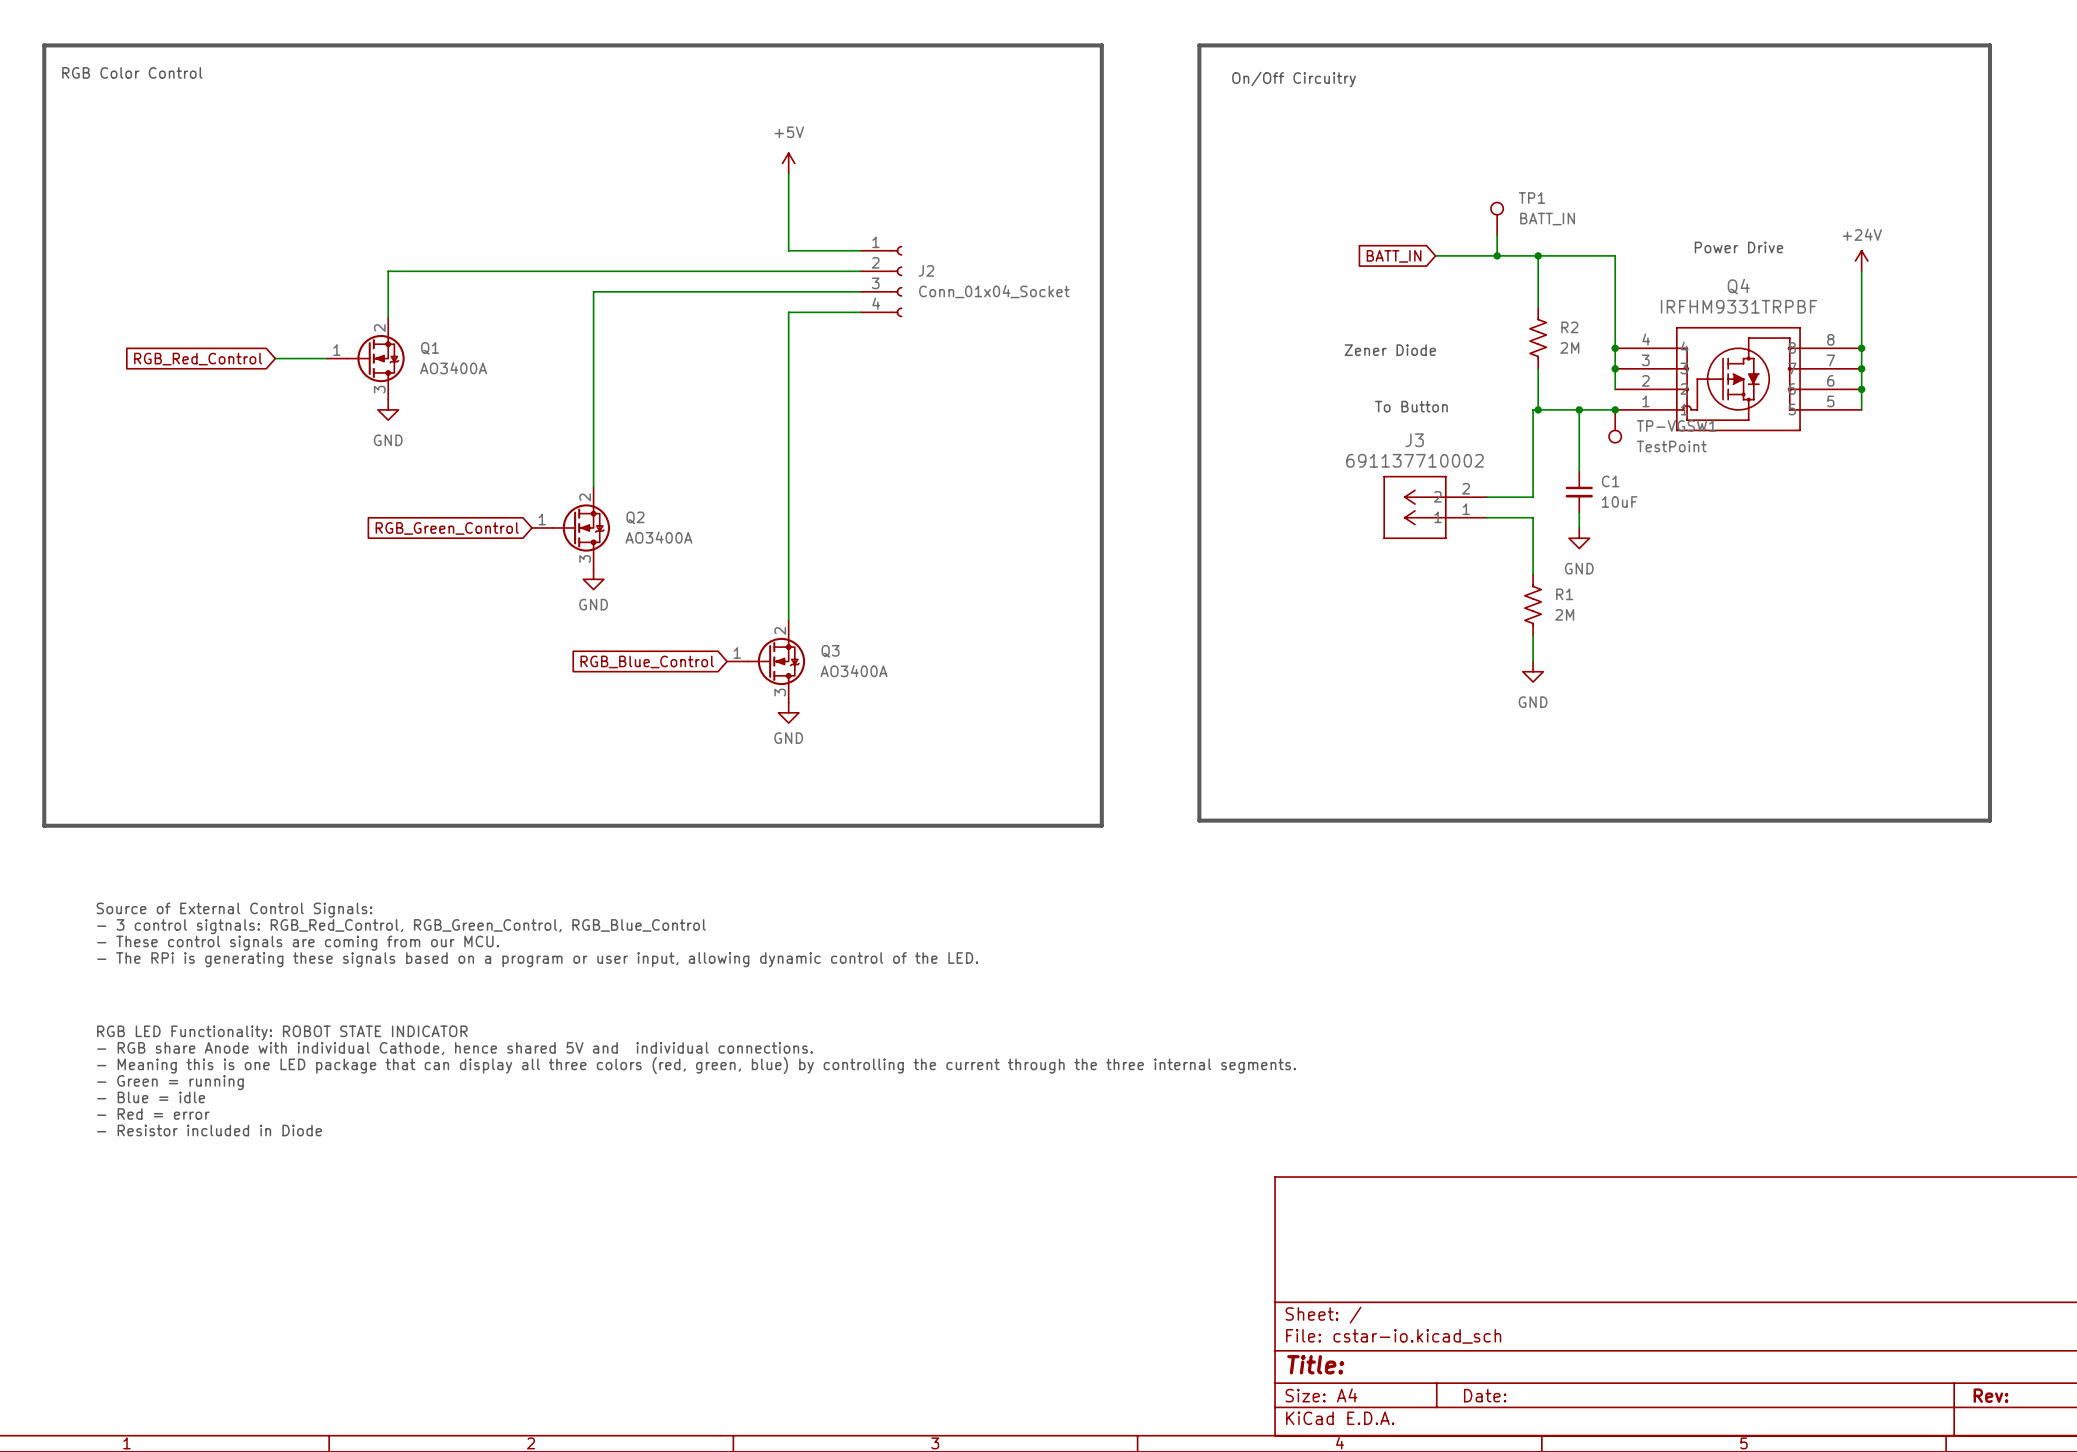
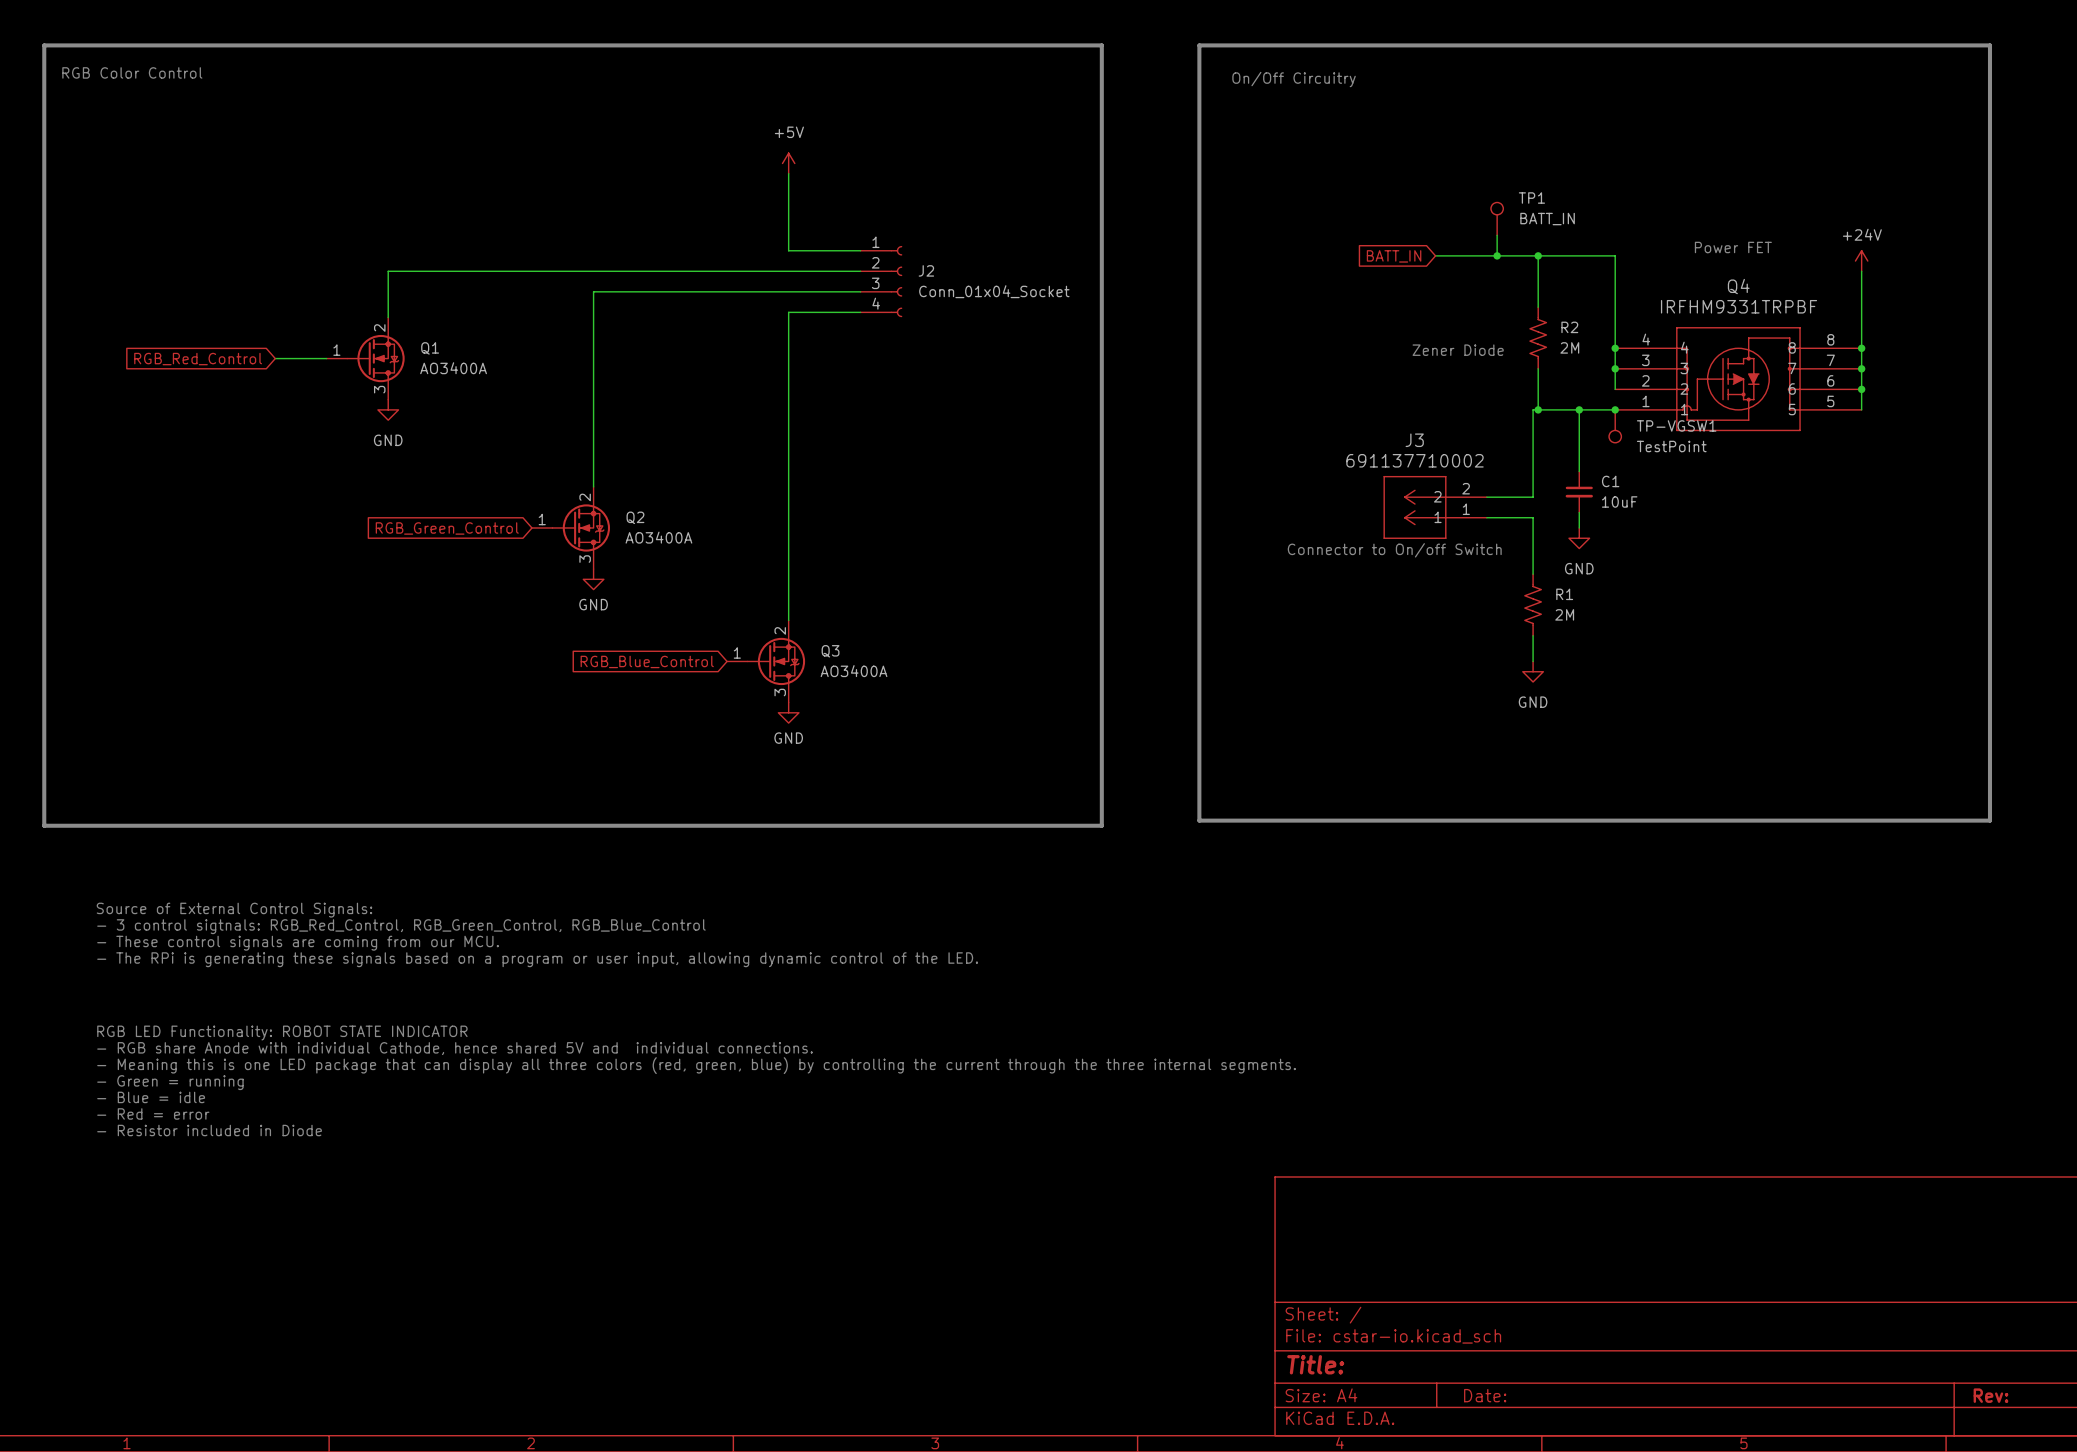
text: Power Drive (1738, 247) -> Power FET (1733, 247)
text position: Zener Diode (1390, 350) -> Zener Diode (1458, 350)
text: To Button (1411, 406) -> none
text: none -> Connector to On/off Switch (1394, 550)

